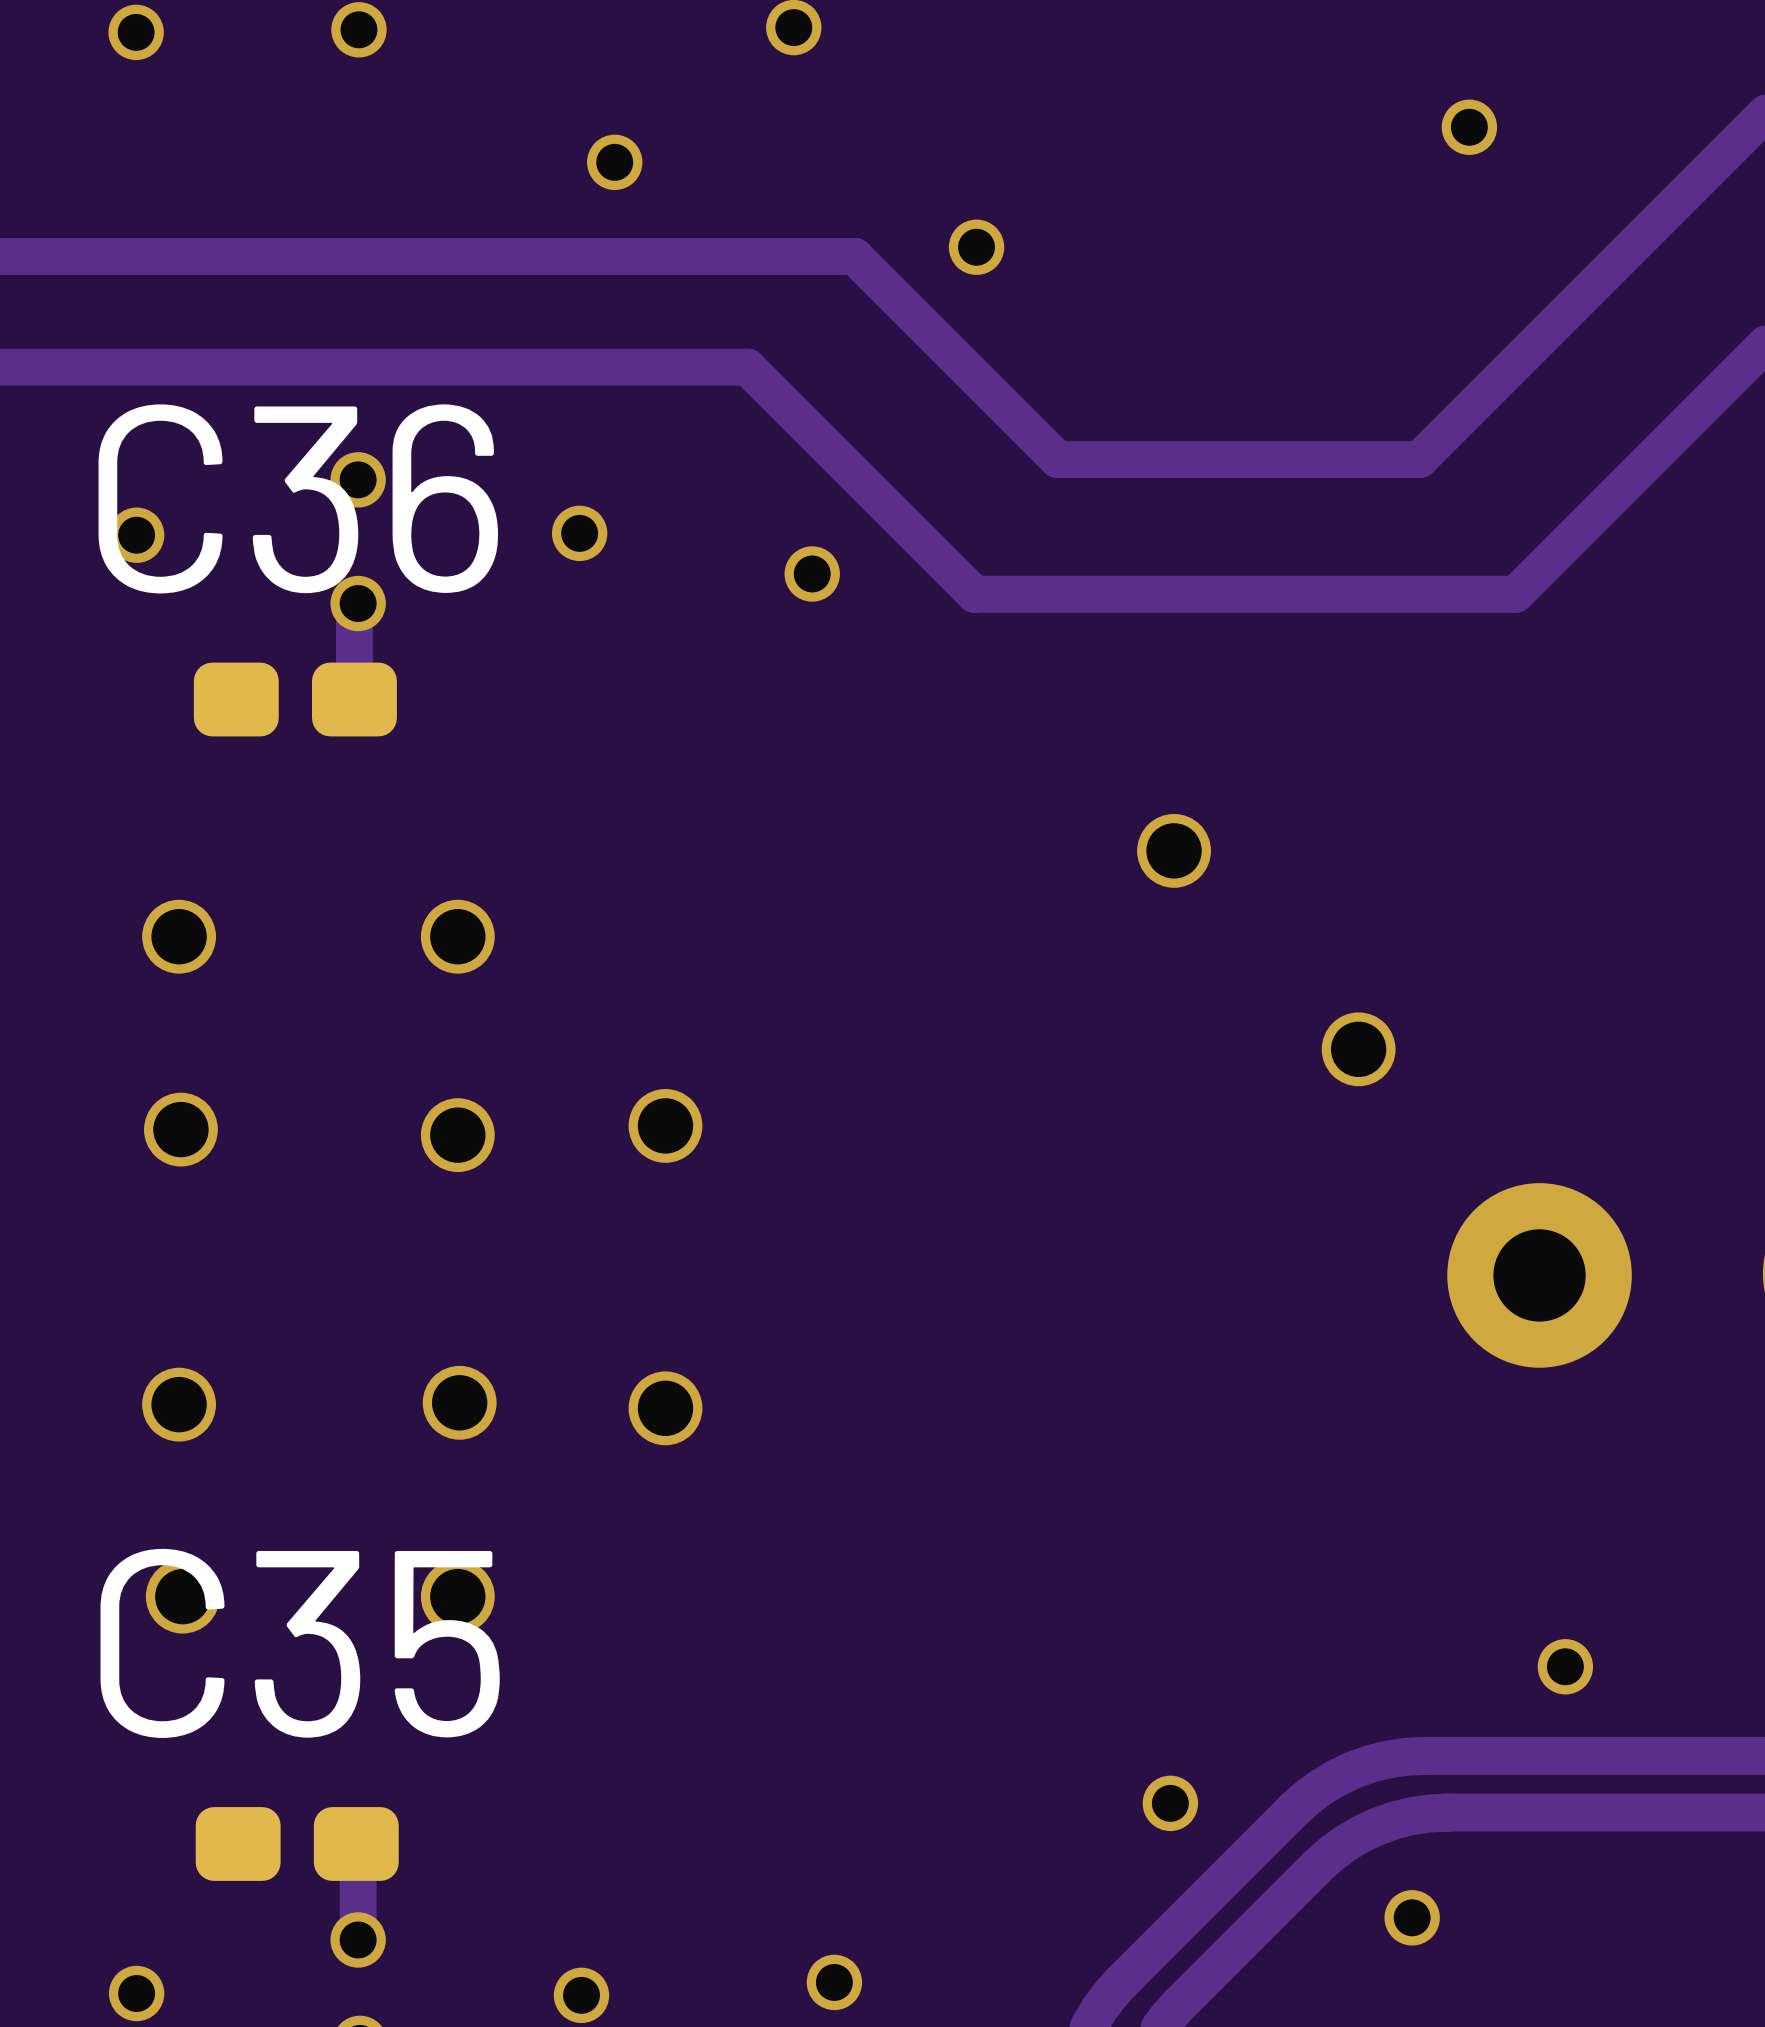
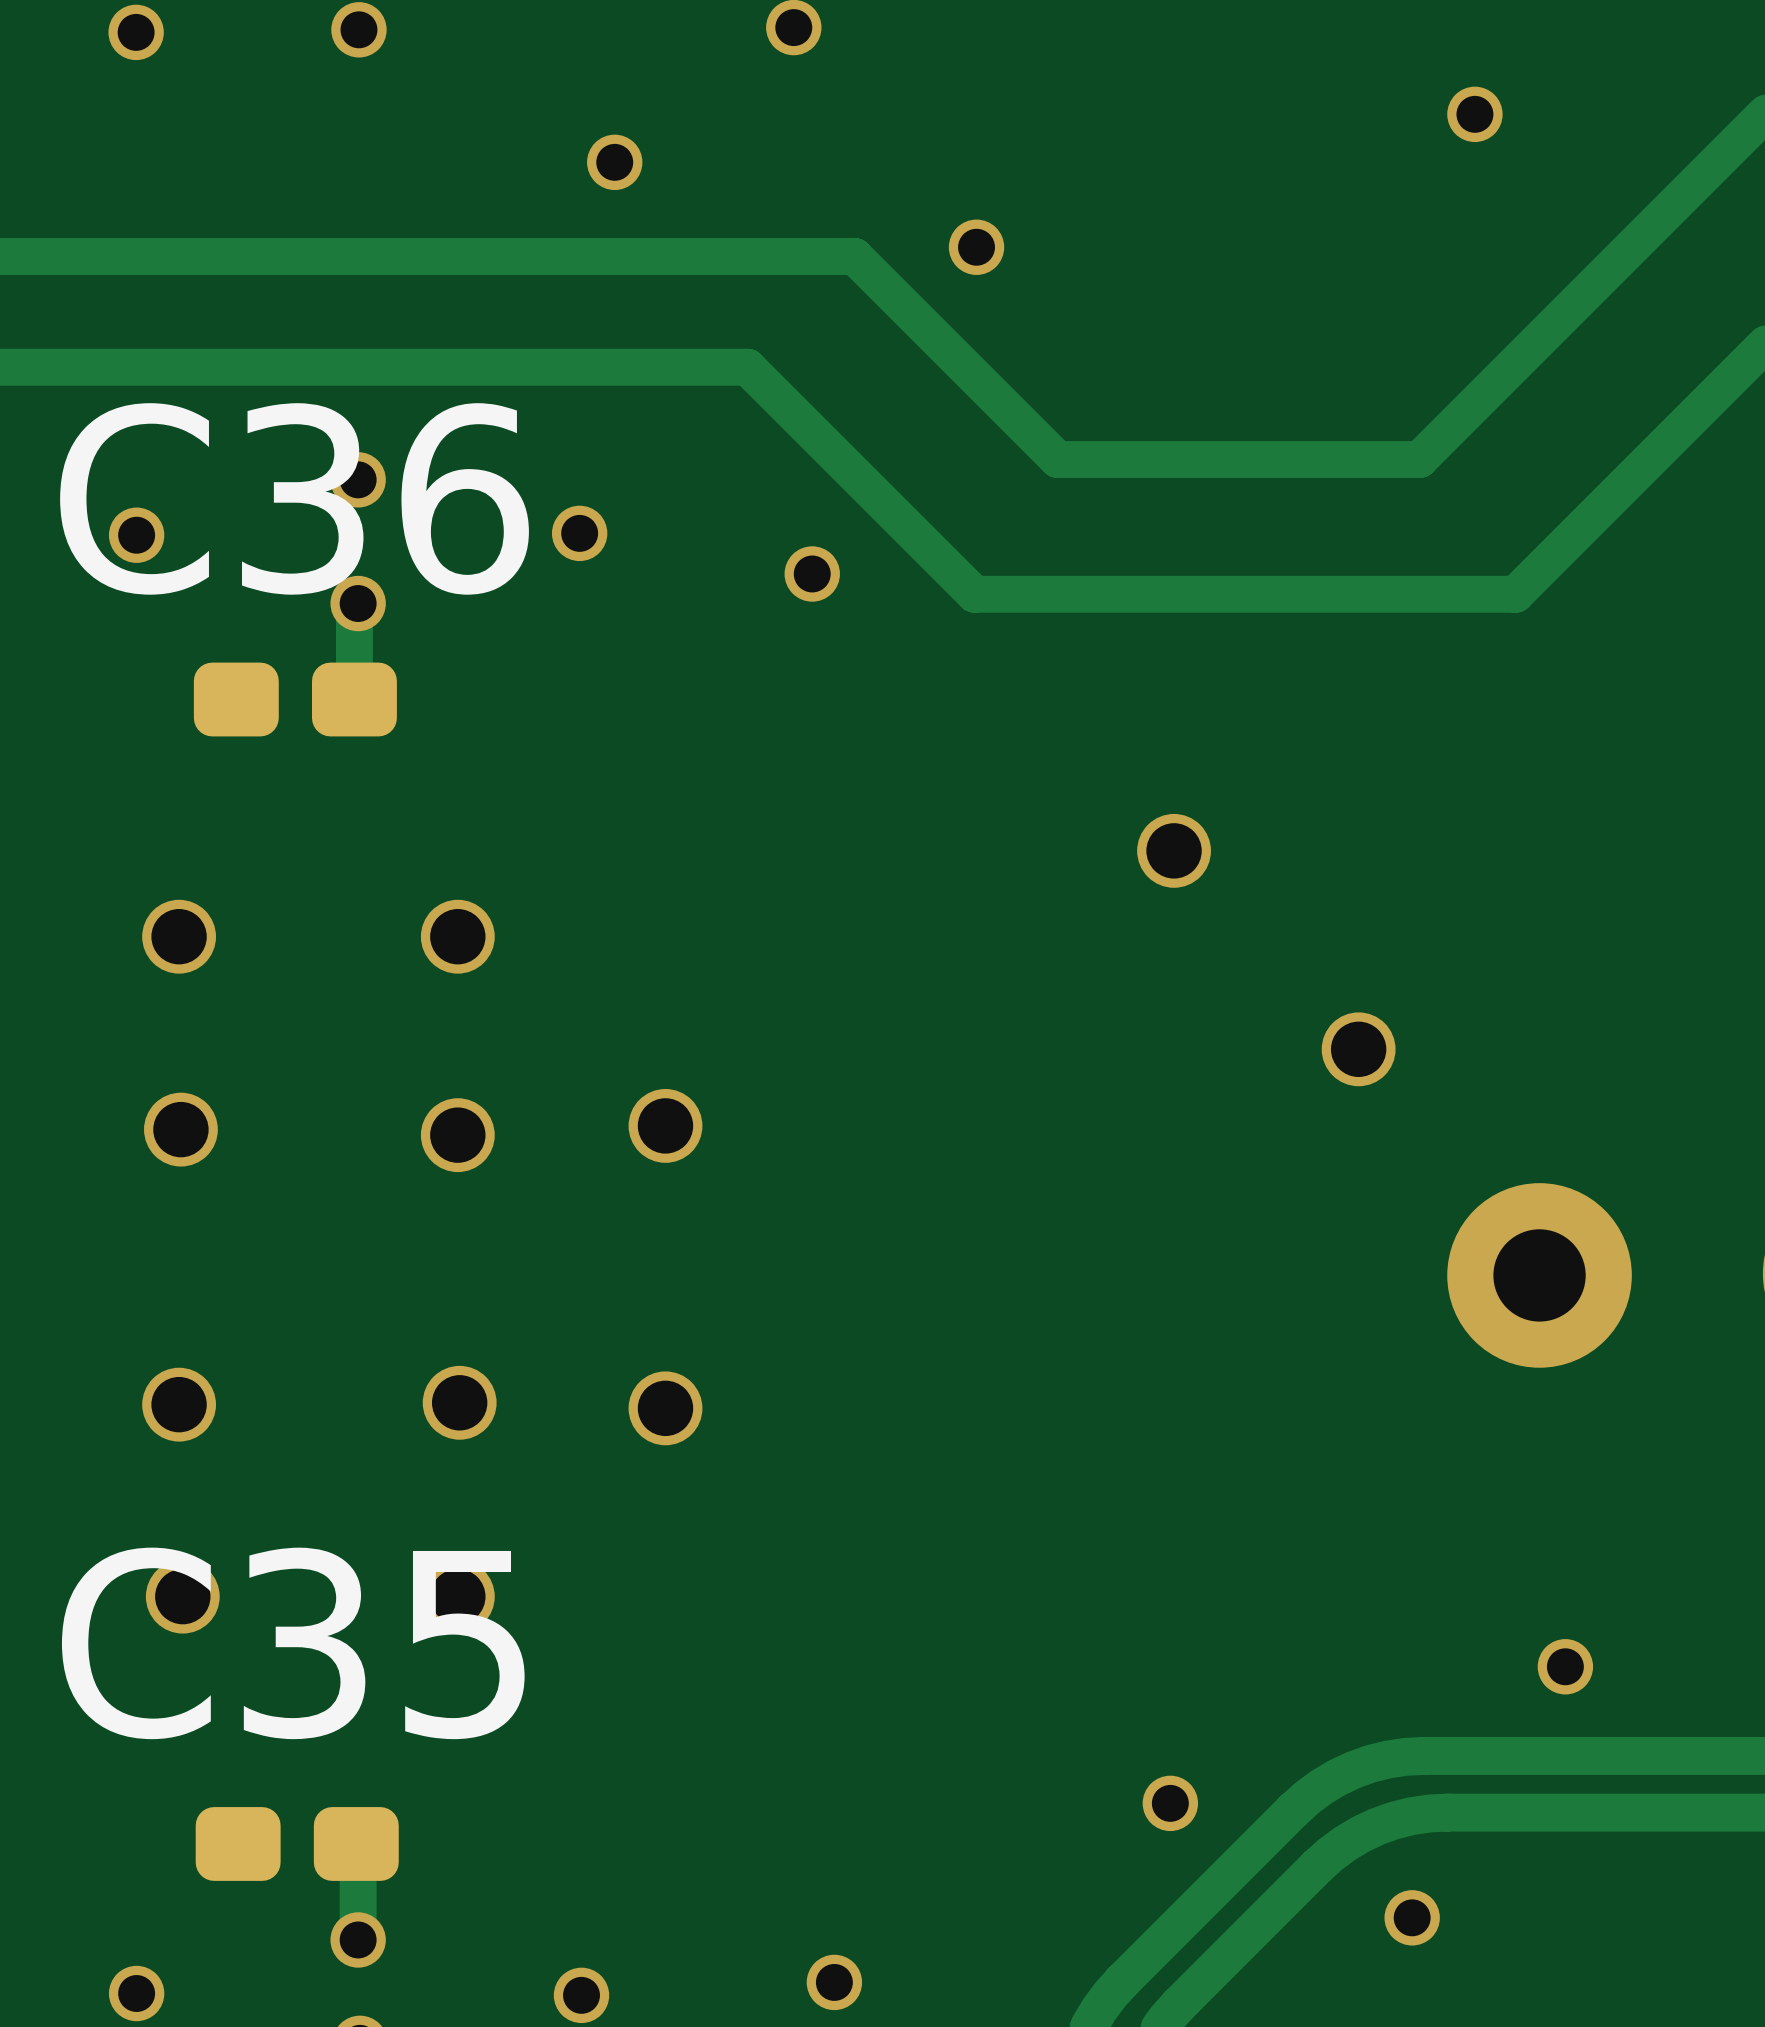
via position: (1469, 127) -> (1474, 114)

